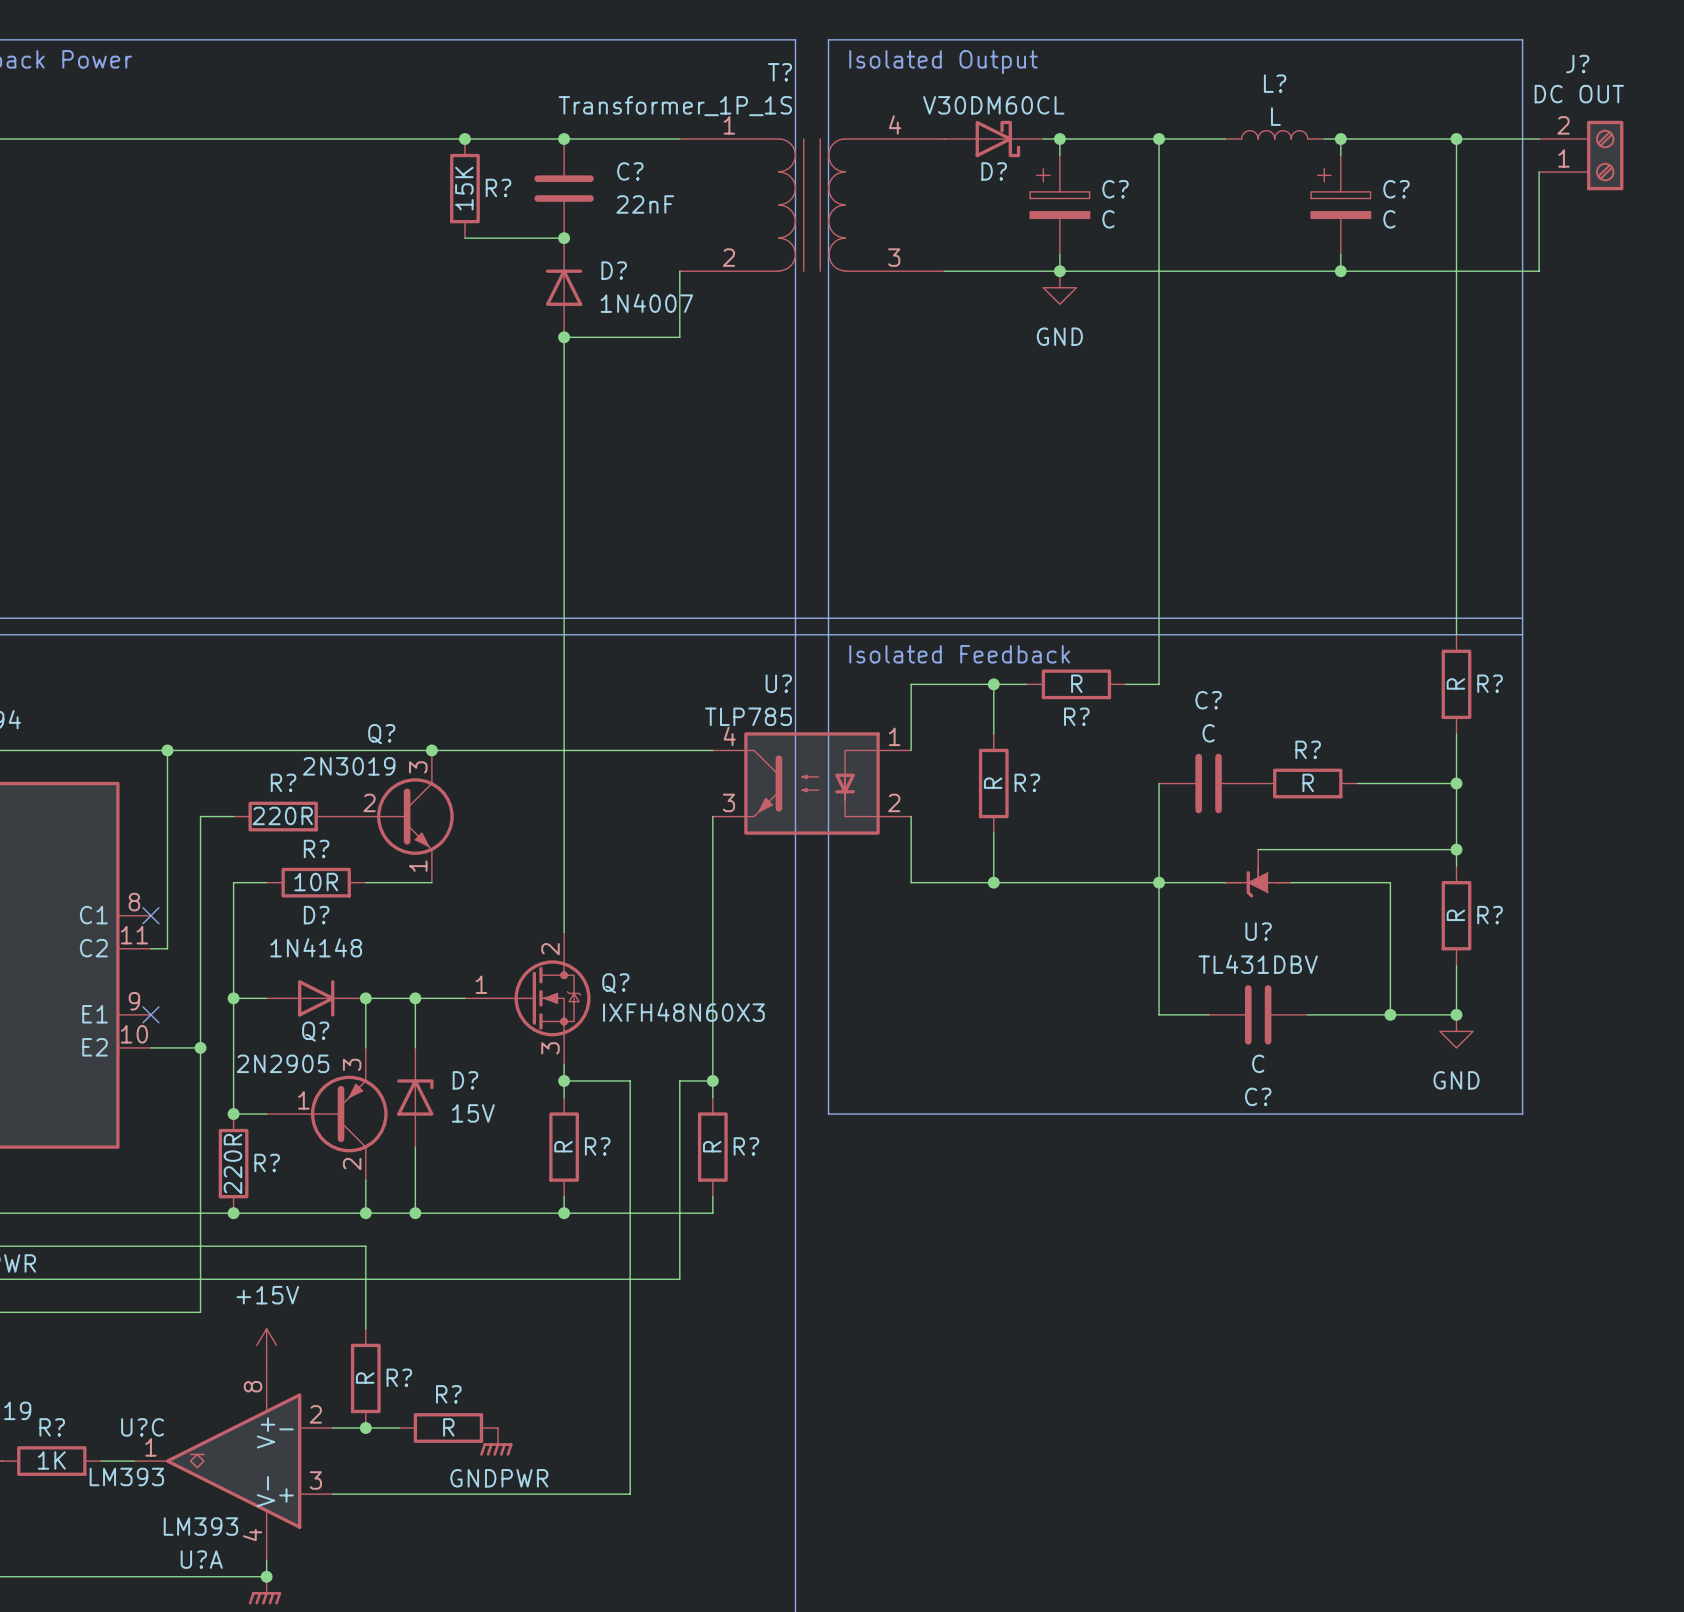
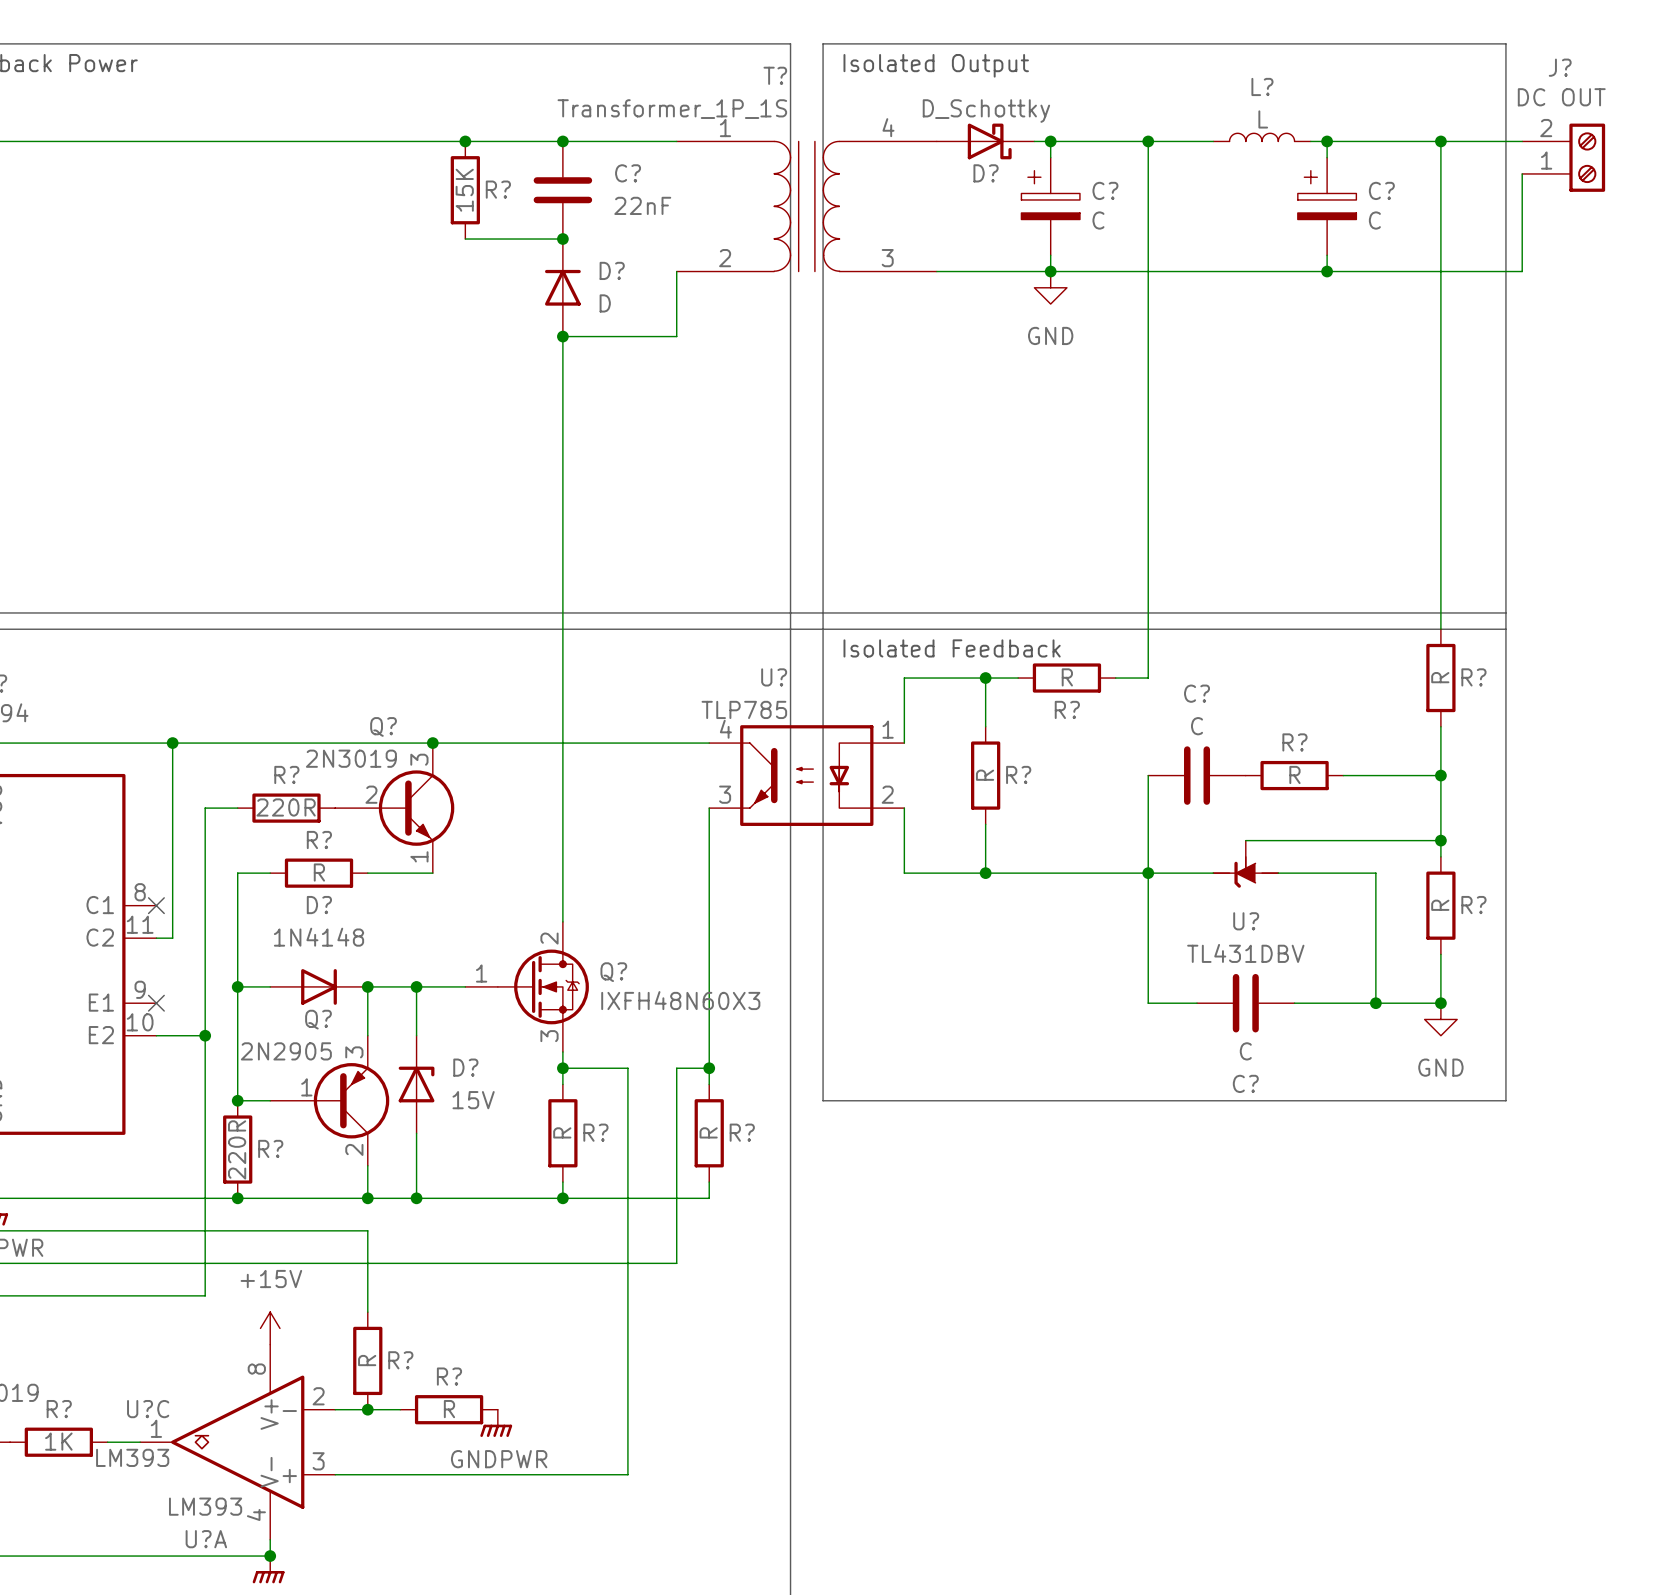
D? value: V30DM60CL (993, 105) -> D_Schottky (986, 111)
D? value: 1N4007 (646, 303) -> D (605, 303)
R? value: 10R (316, 882) -> R (319, 872)

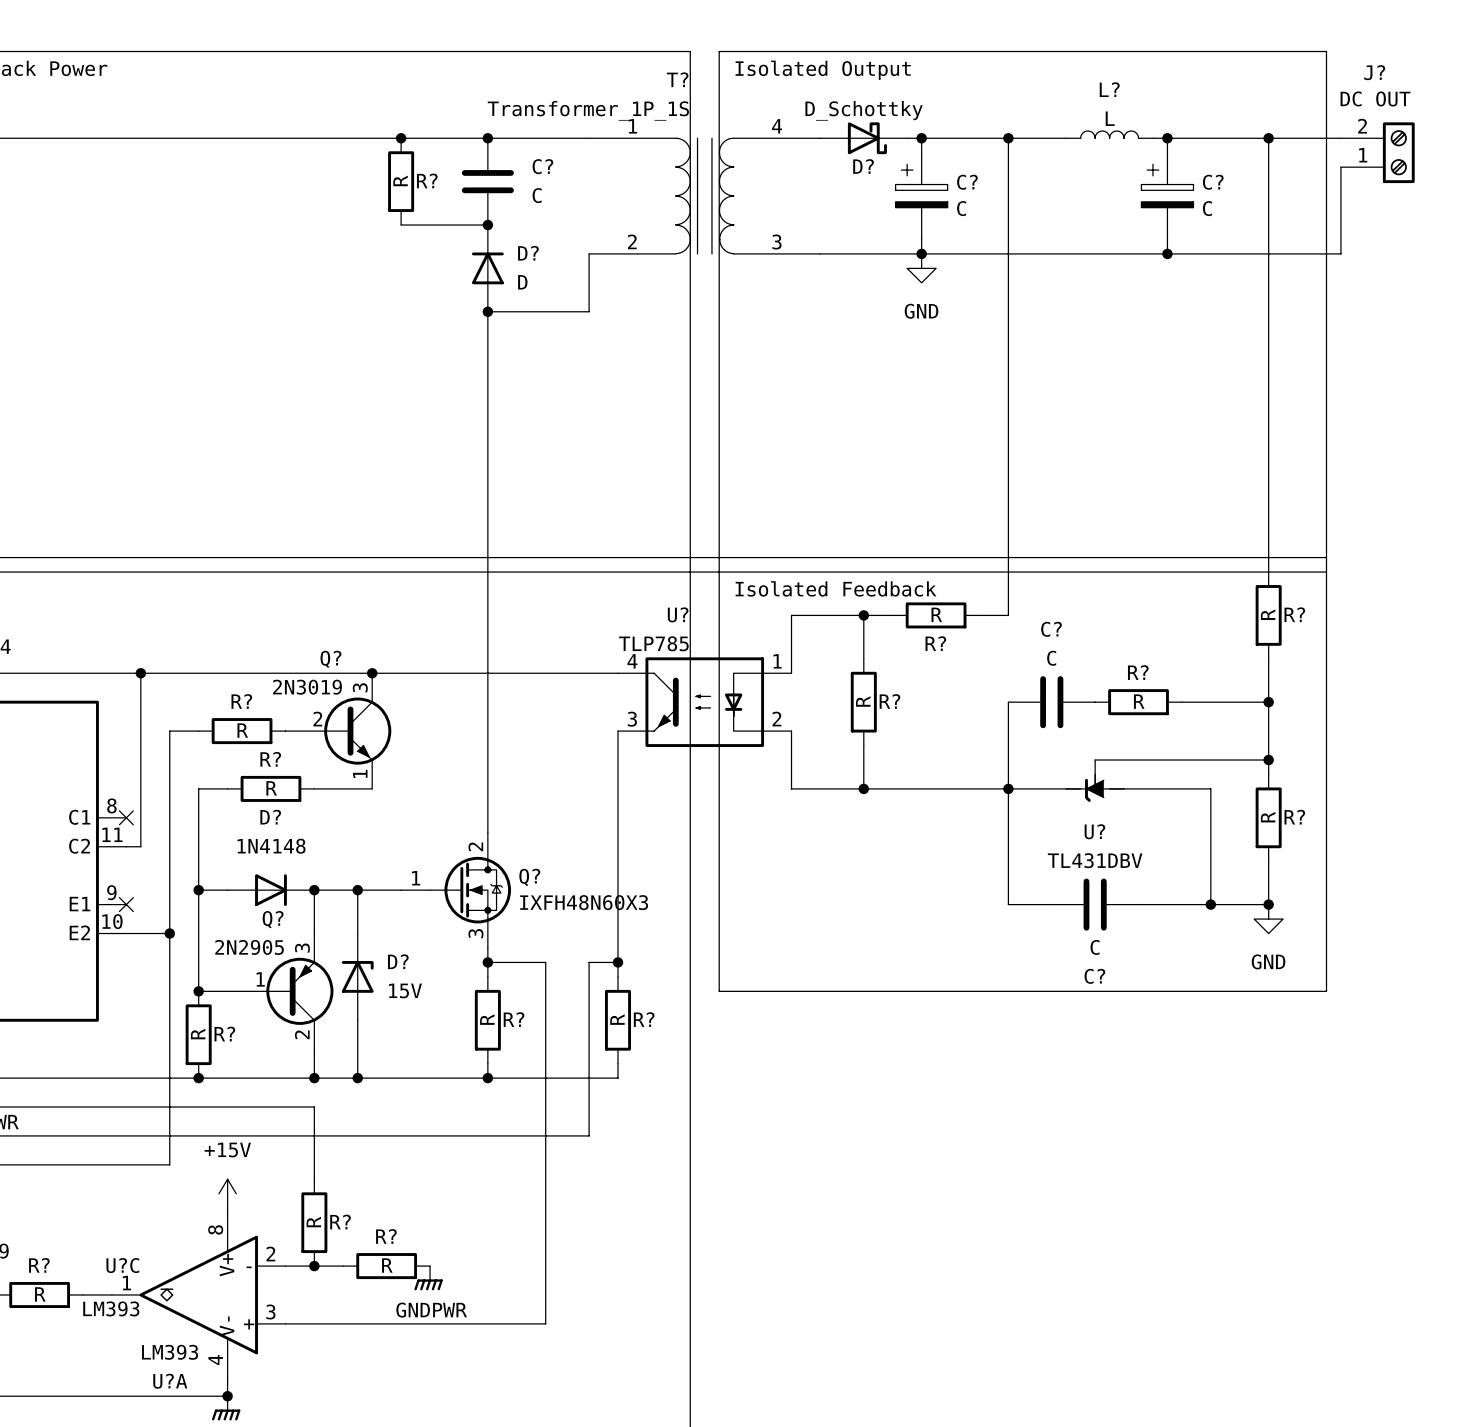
R? value: 15K (464, 190) -> R (400, 180)
C? value: 22nF (642, 205) -> C (537, 195)
R? value: 220R (286, 807) -> R (242, 730)
R? value: 220R (237, 1149) -> R (198, 1034)
R? value: 1K (58, 1441) -> R (40, 1294)

